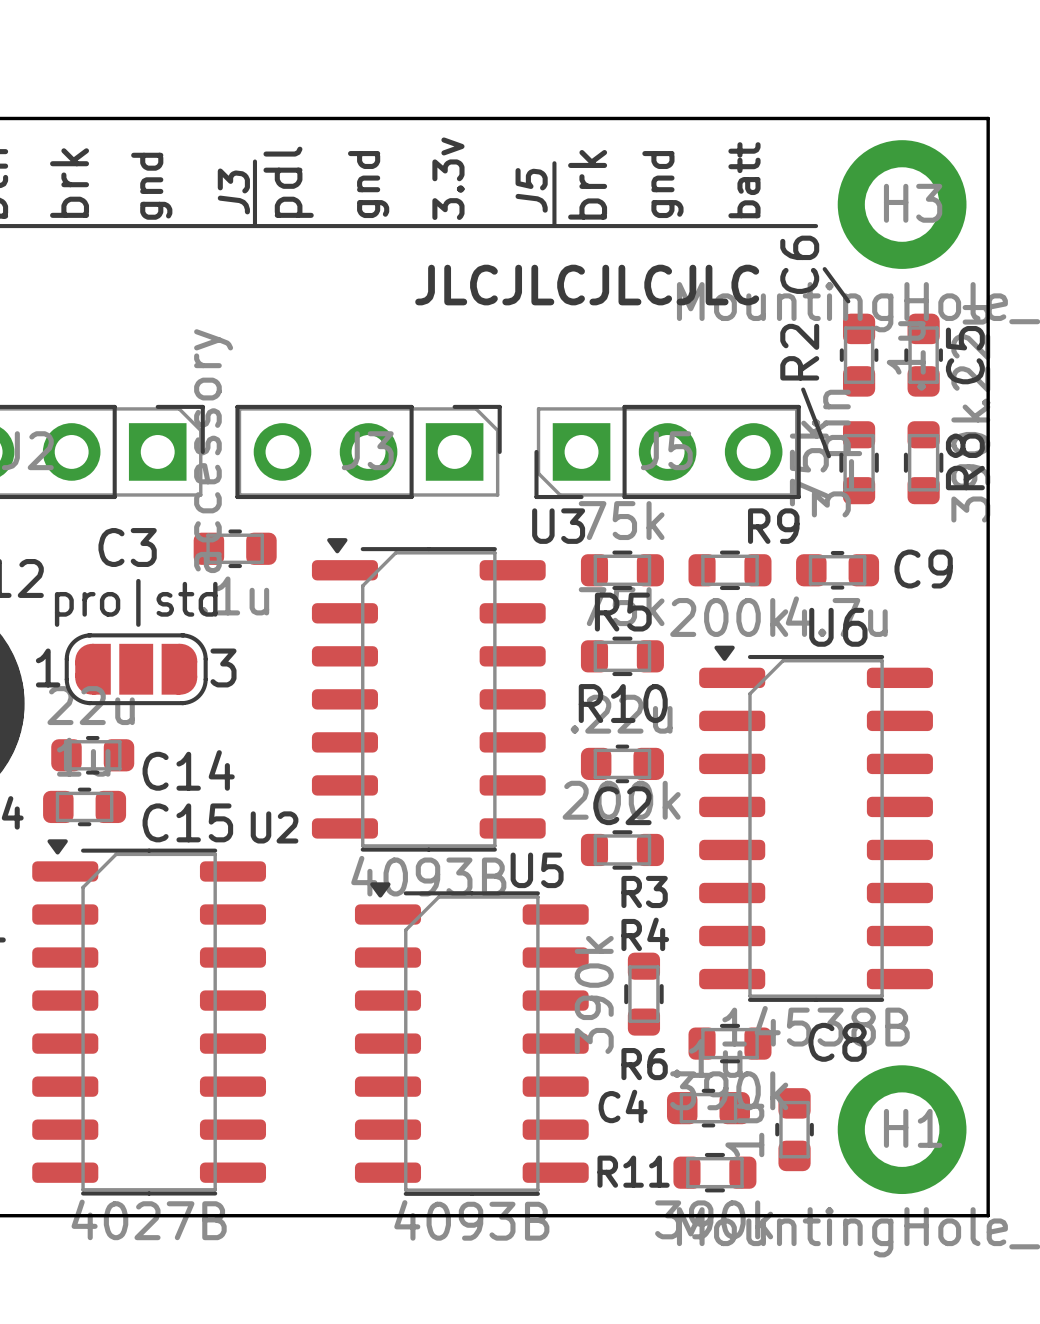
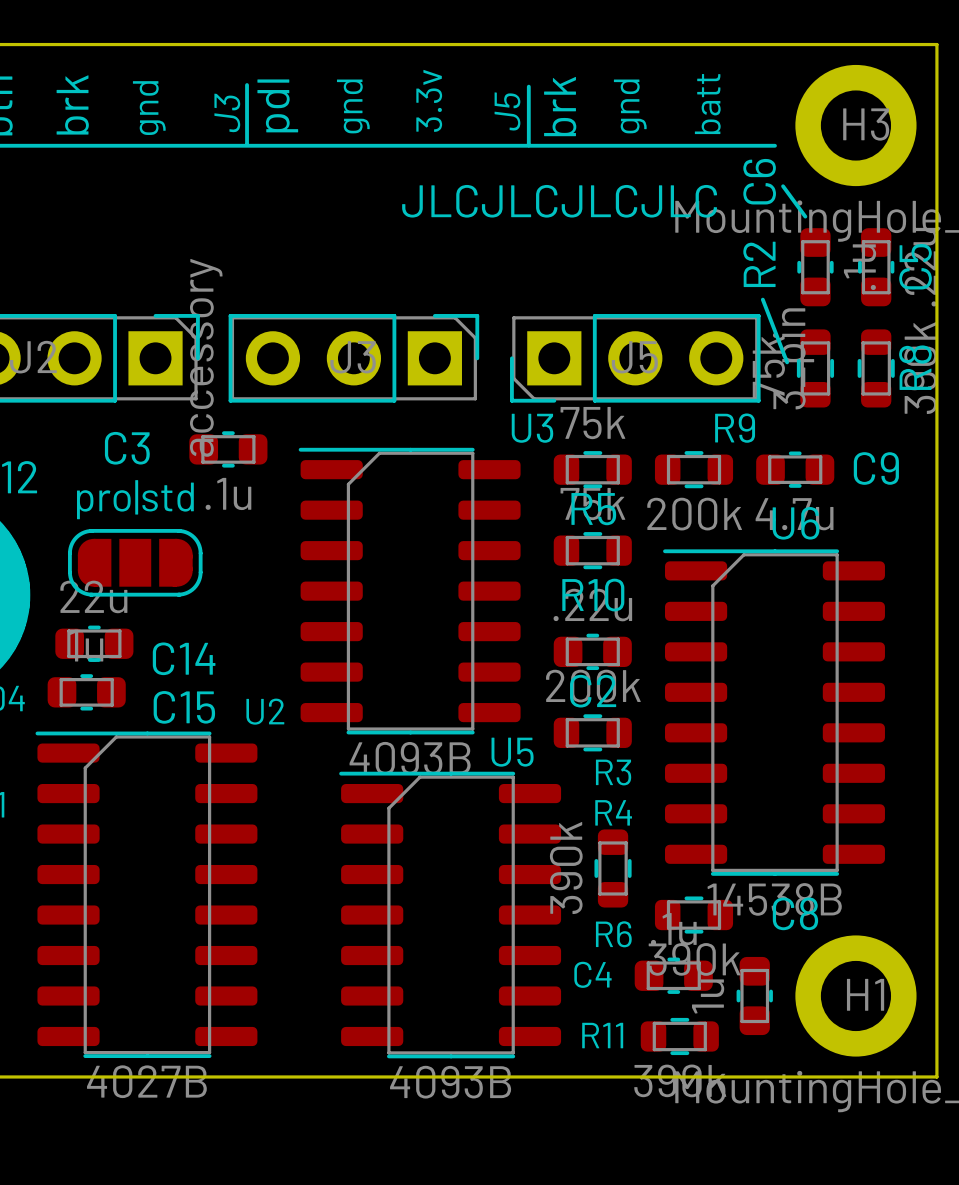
U3 footprint: [311, 538, 546, 852] -> [298, 447, 521, 735]
U6 footprint: [699, 645, 933, 1002] -> [663, 549, 885, 876]
part text: 1 (48, 667) -> none
part text: 3 (223, 667) -> none
U2 footprint: [32, 839, 267, 1196] -> [35, 731, 258, 1059]
U5 footprint: [354, 882, 589, 1196] -> [339, 771, 562, 1059]

